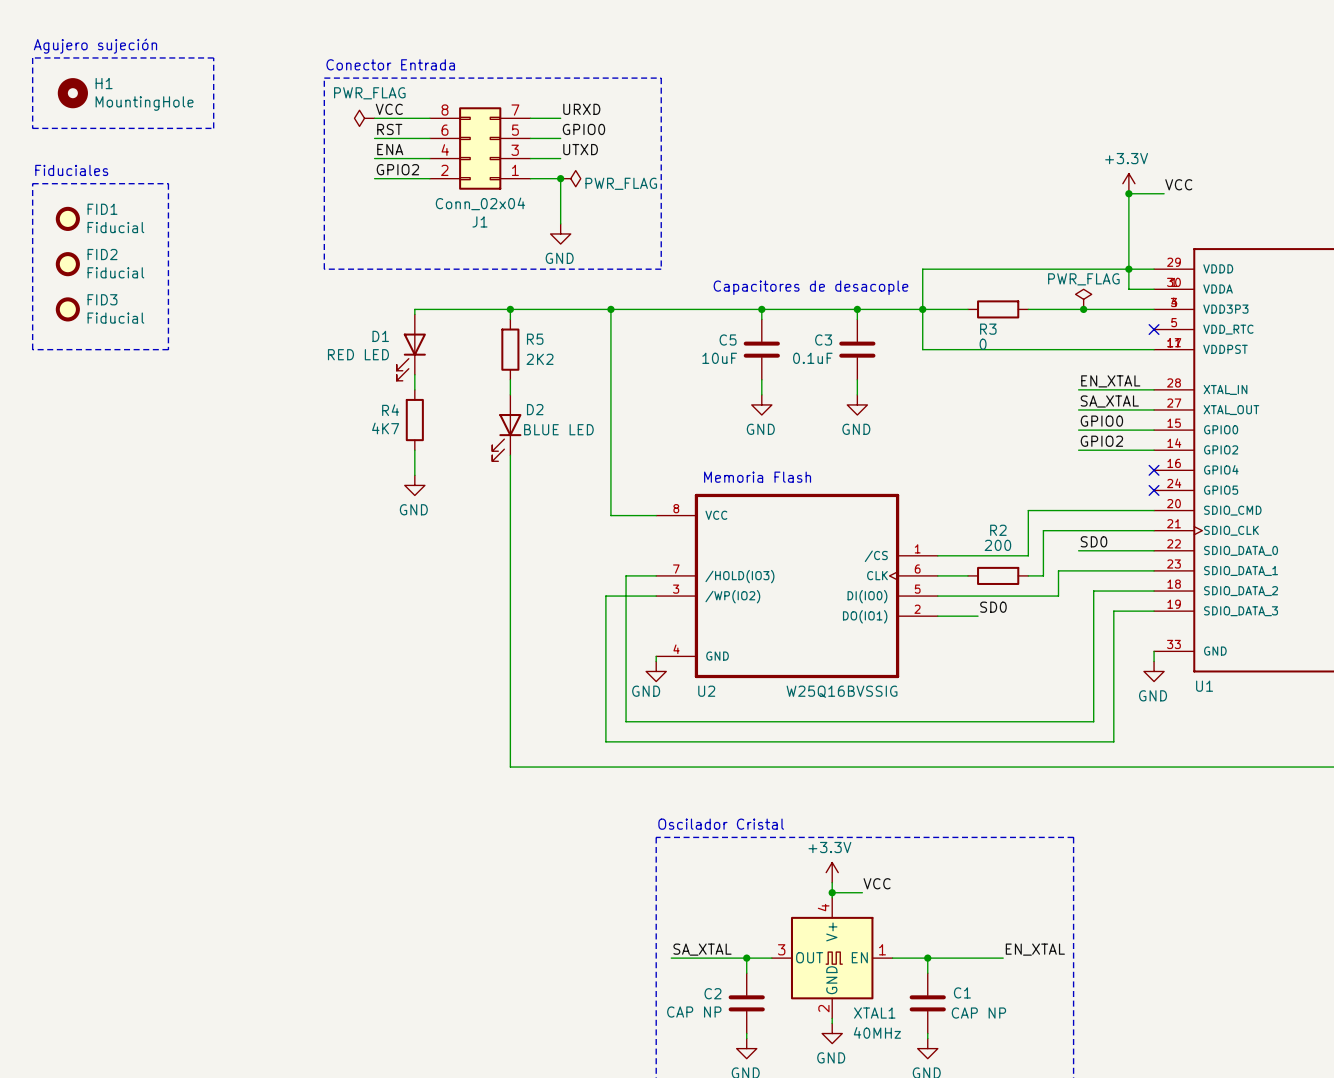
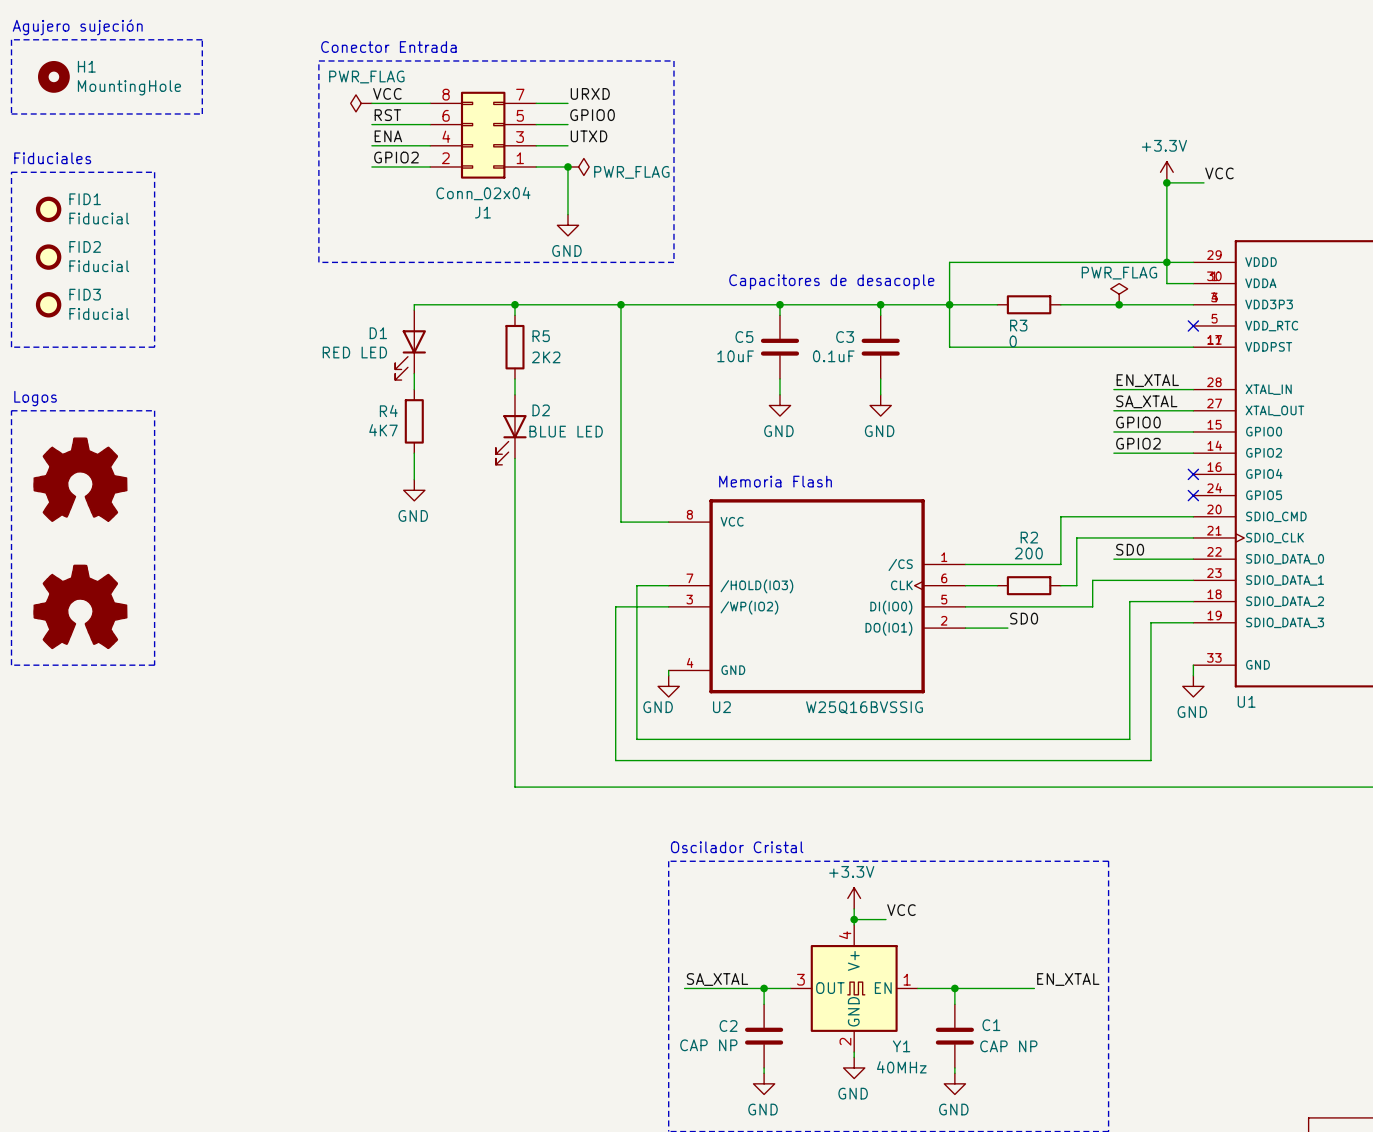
text: none -> Logos (35, 398)
line: none -> (11, 410) (154, 410) (154, 665) (11, 665) (11, 410)
part: none -> (80, 479)
part: none -> (80, 606)
XTAL1 name: XTAL1 (874, 1013) -> Y1 (901, 1046)

